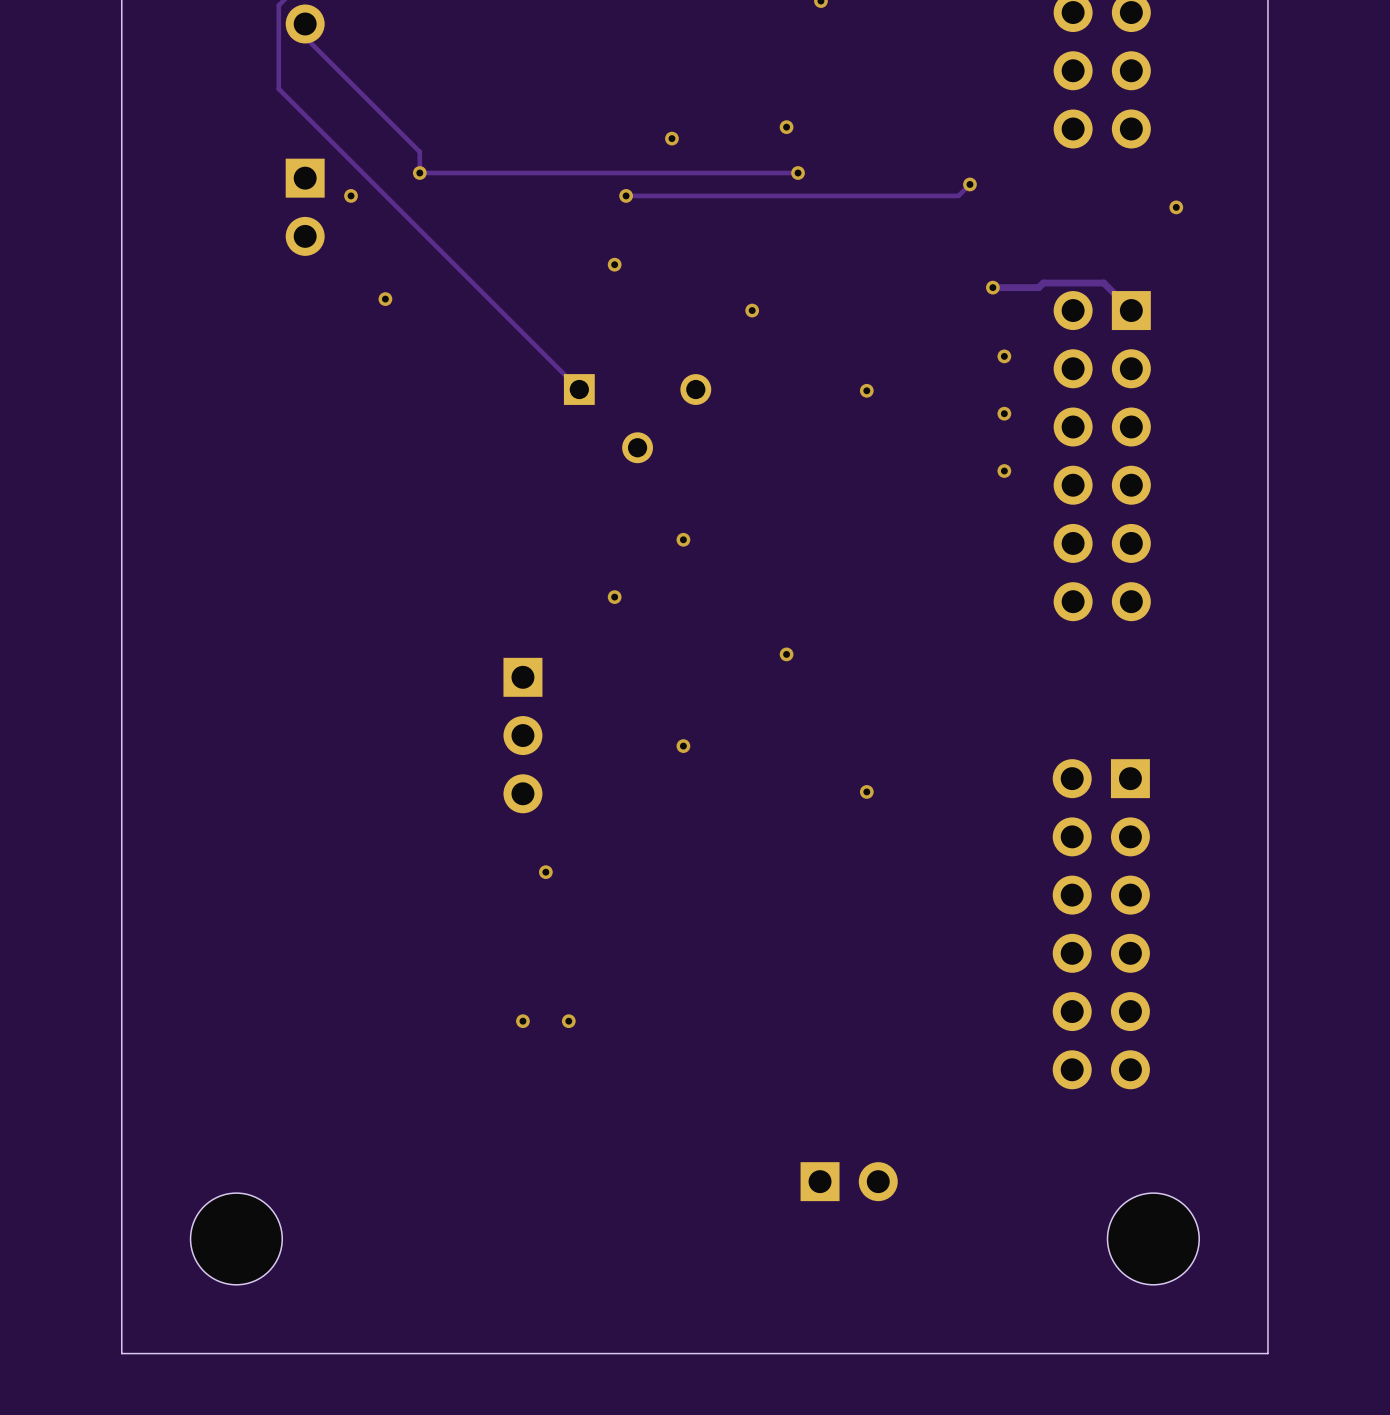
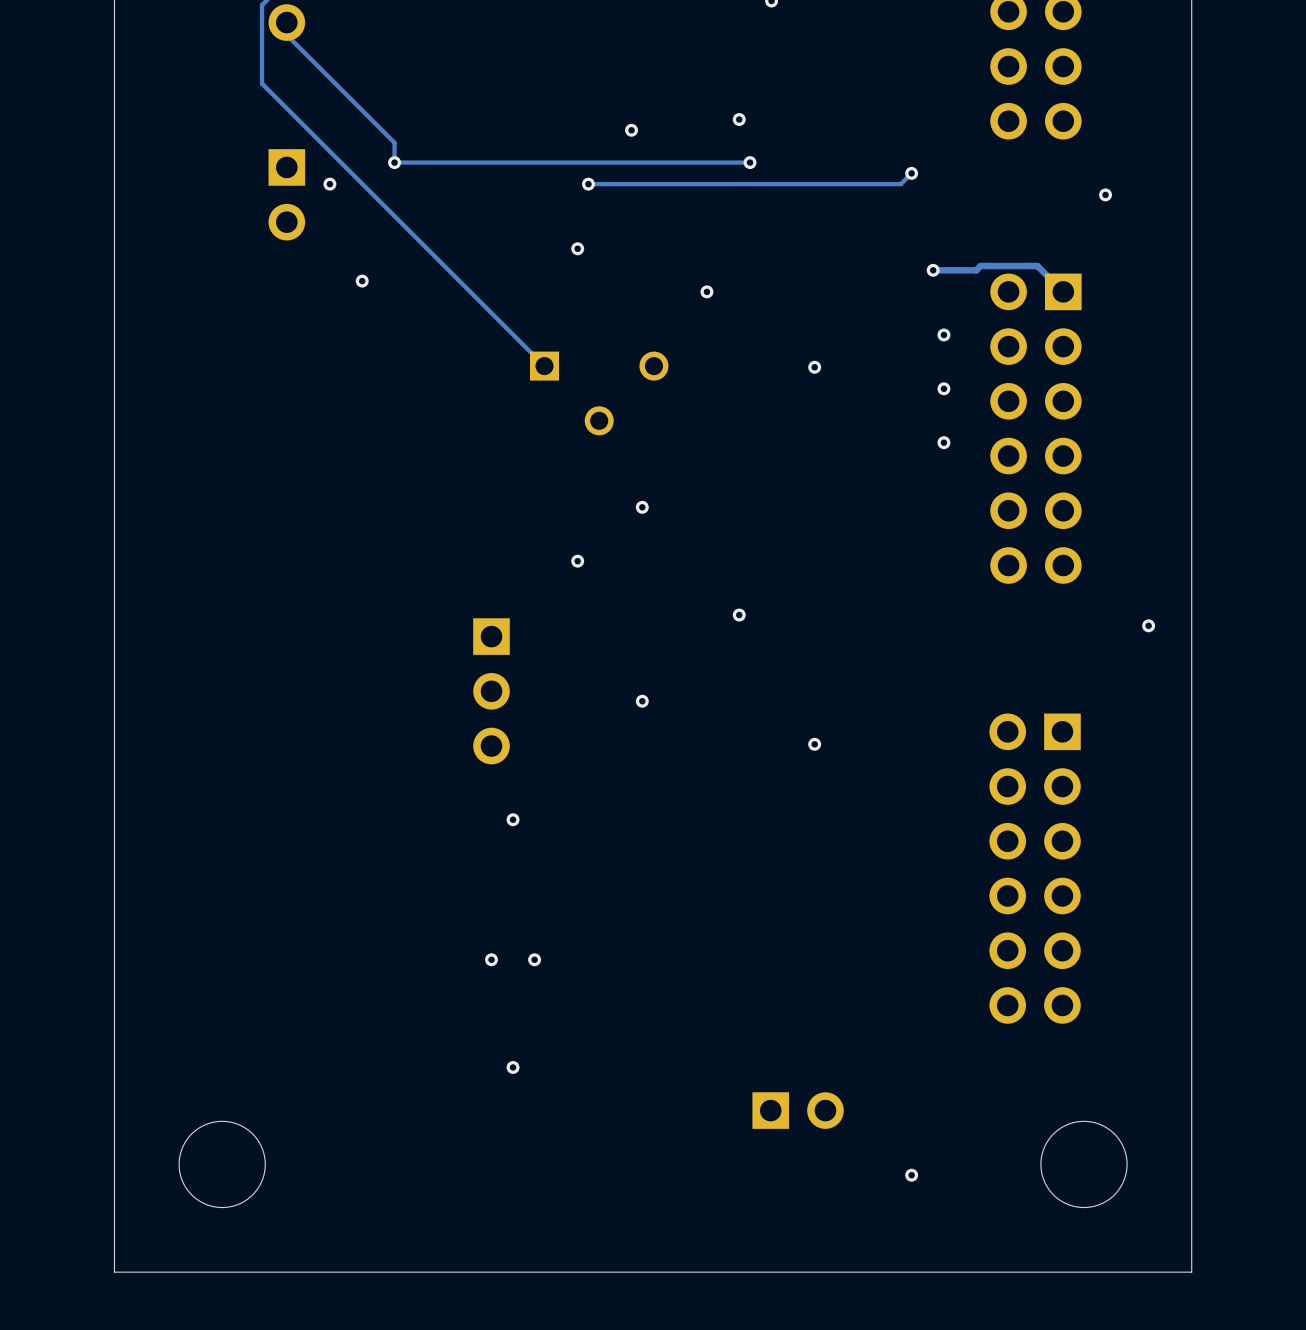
via: none -> (1148, 625)
via: none -> (513, 1067)
via: none -> (911, 1175)

